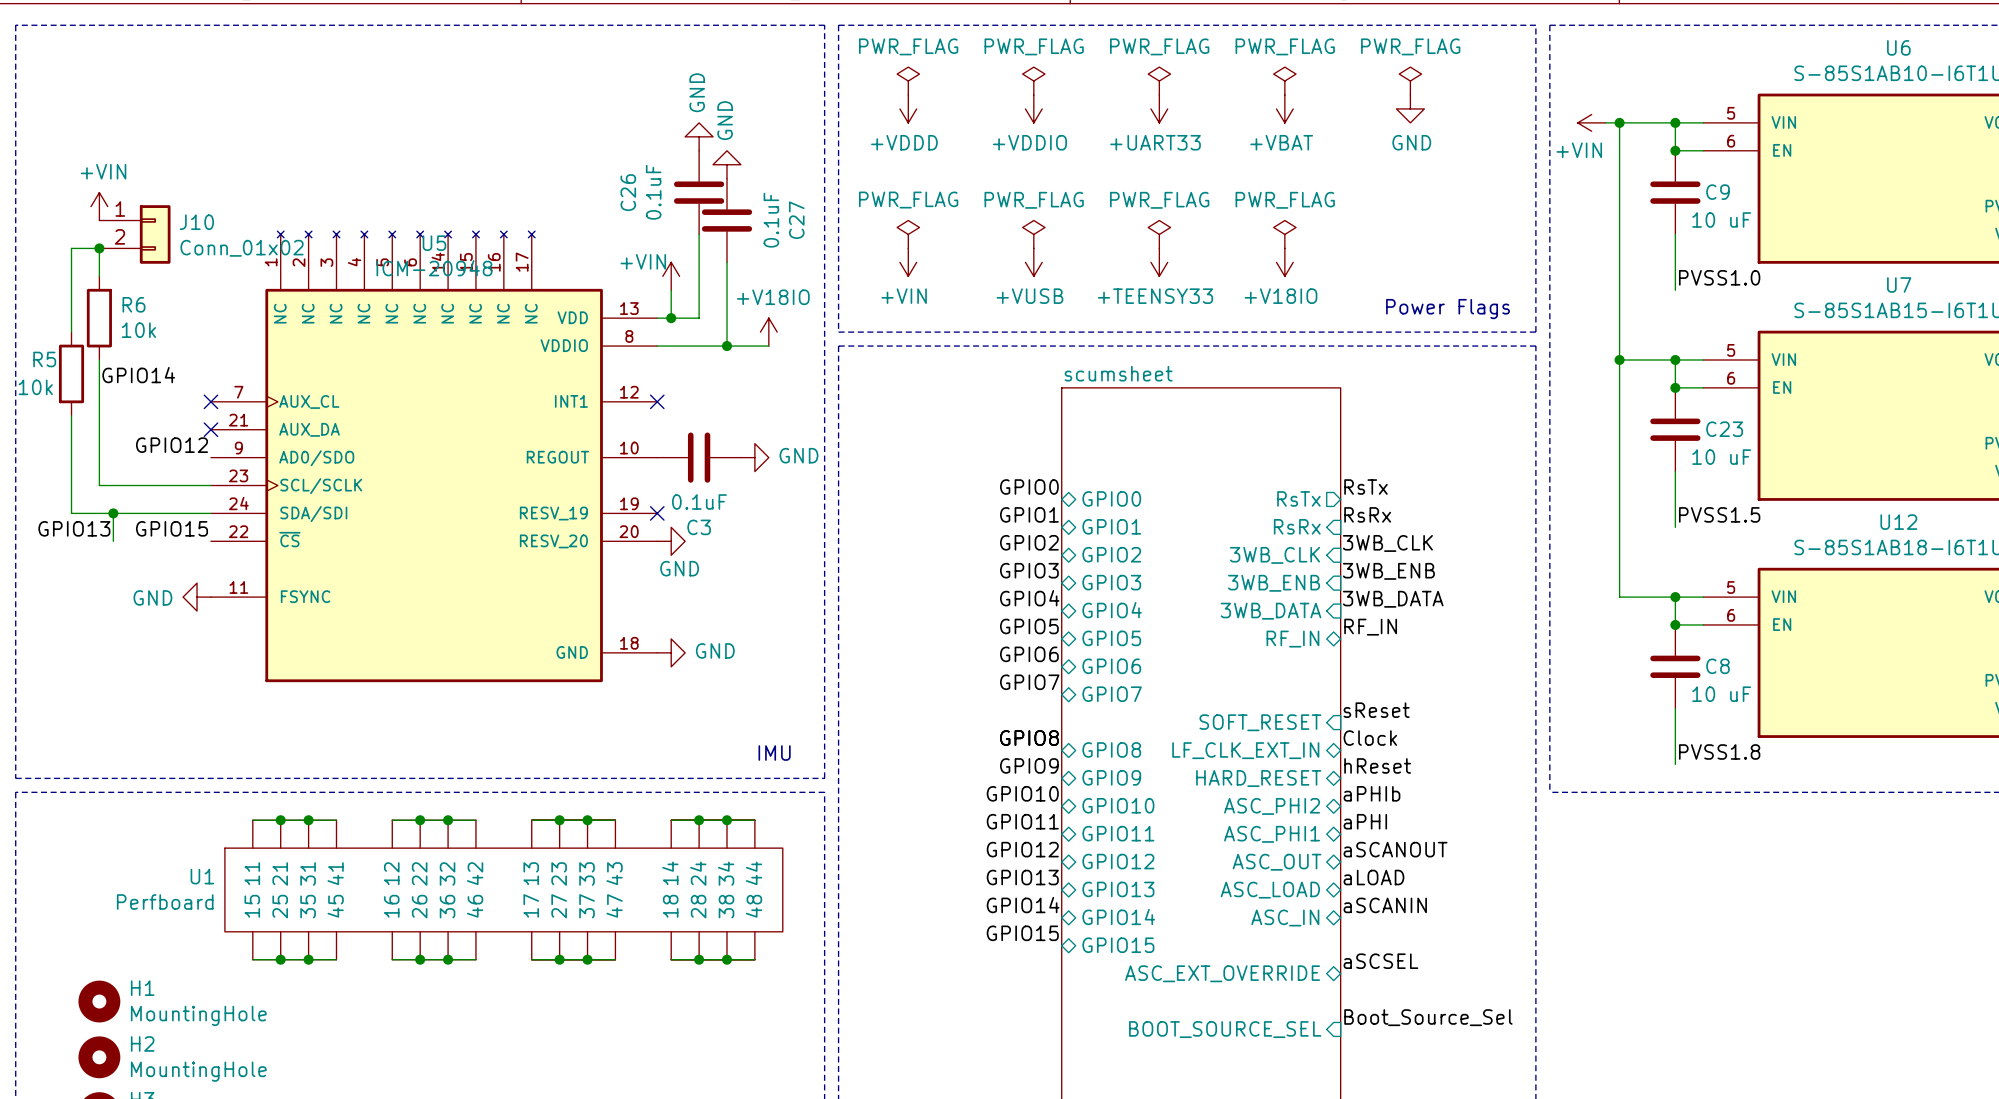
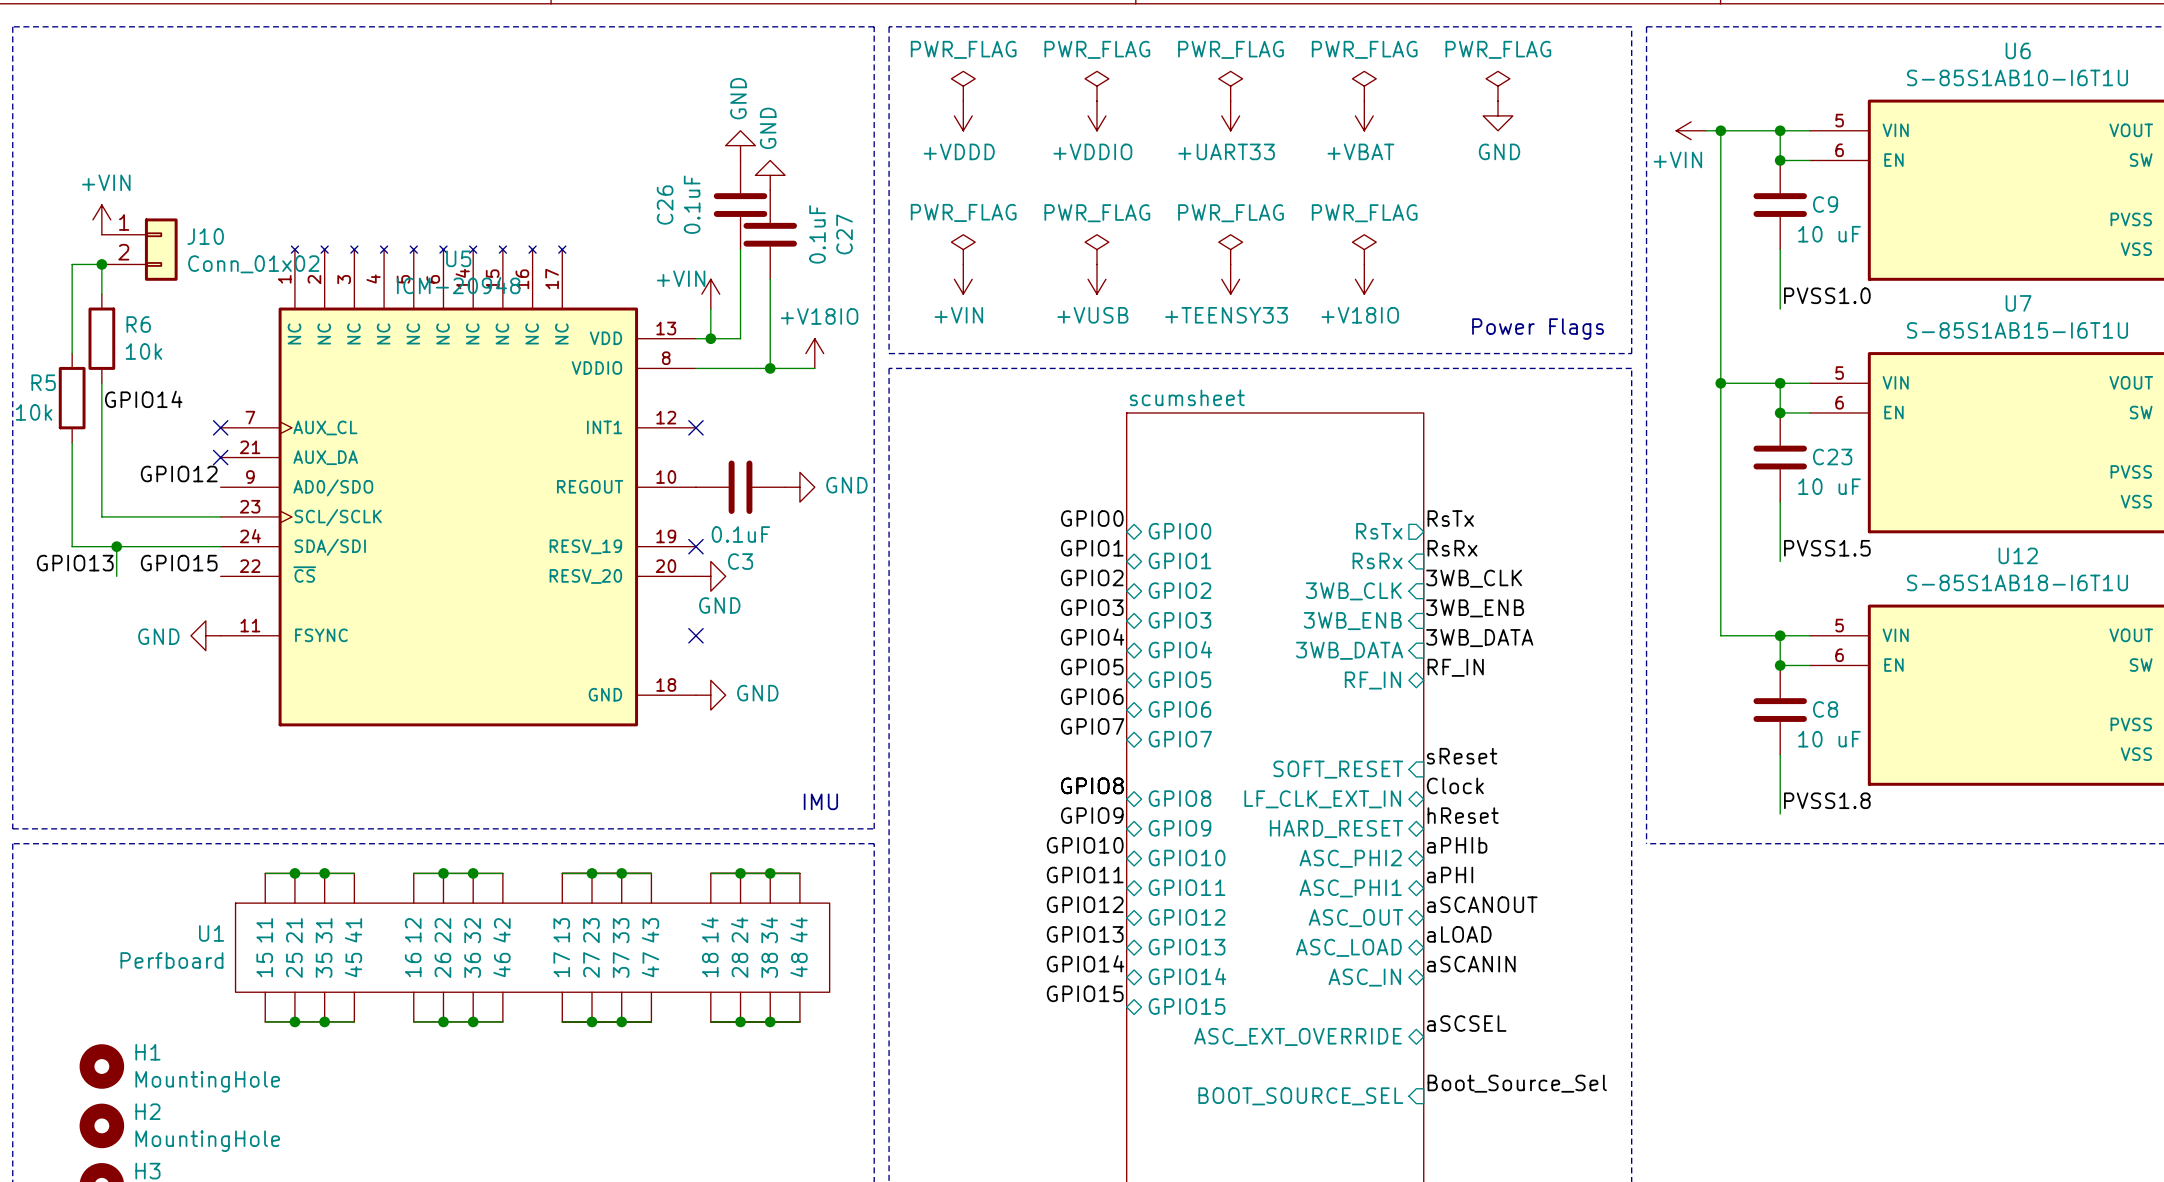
no-connect mark: none -> (695, 635)

